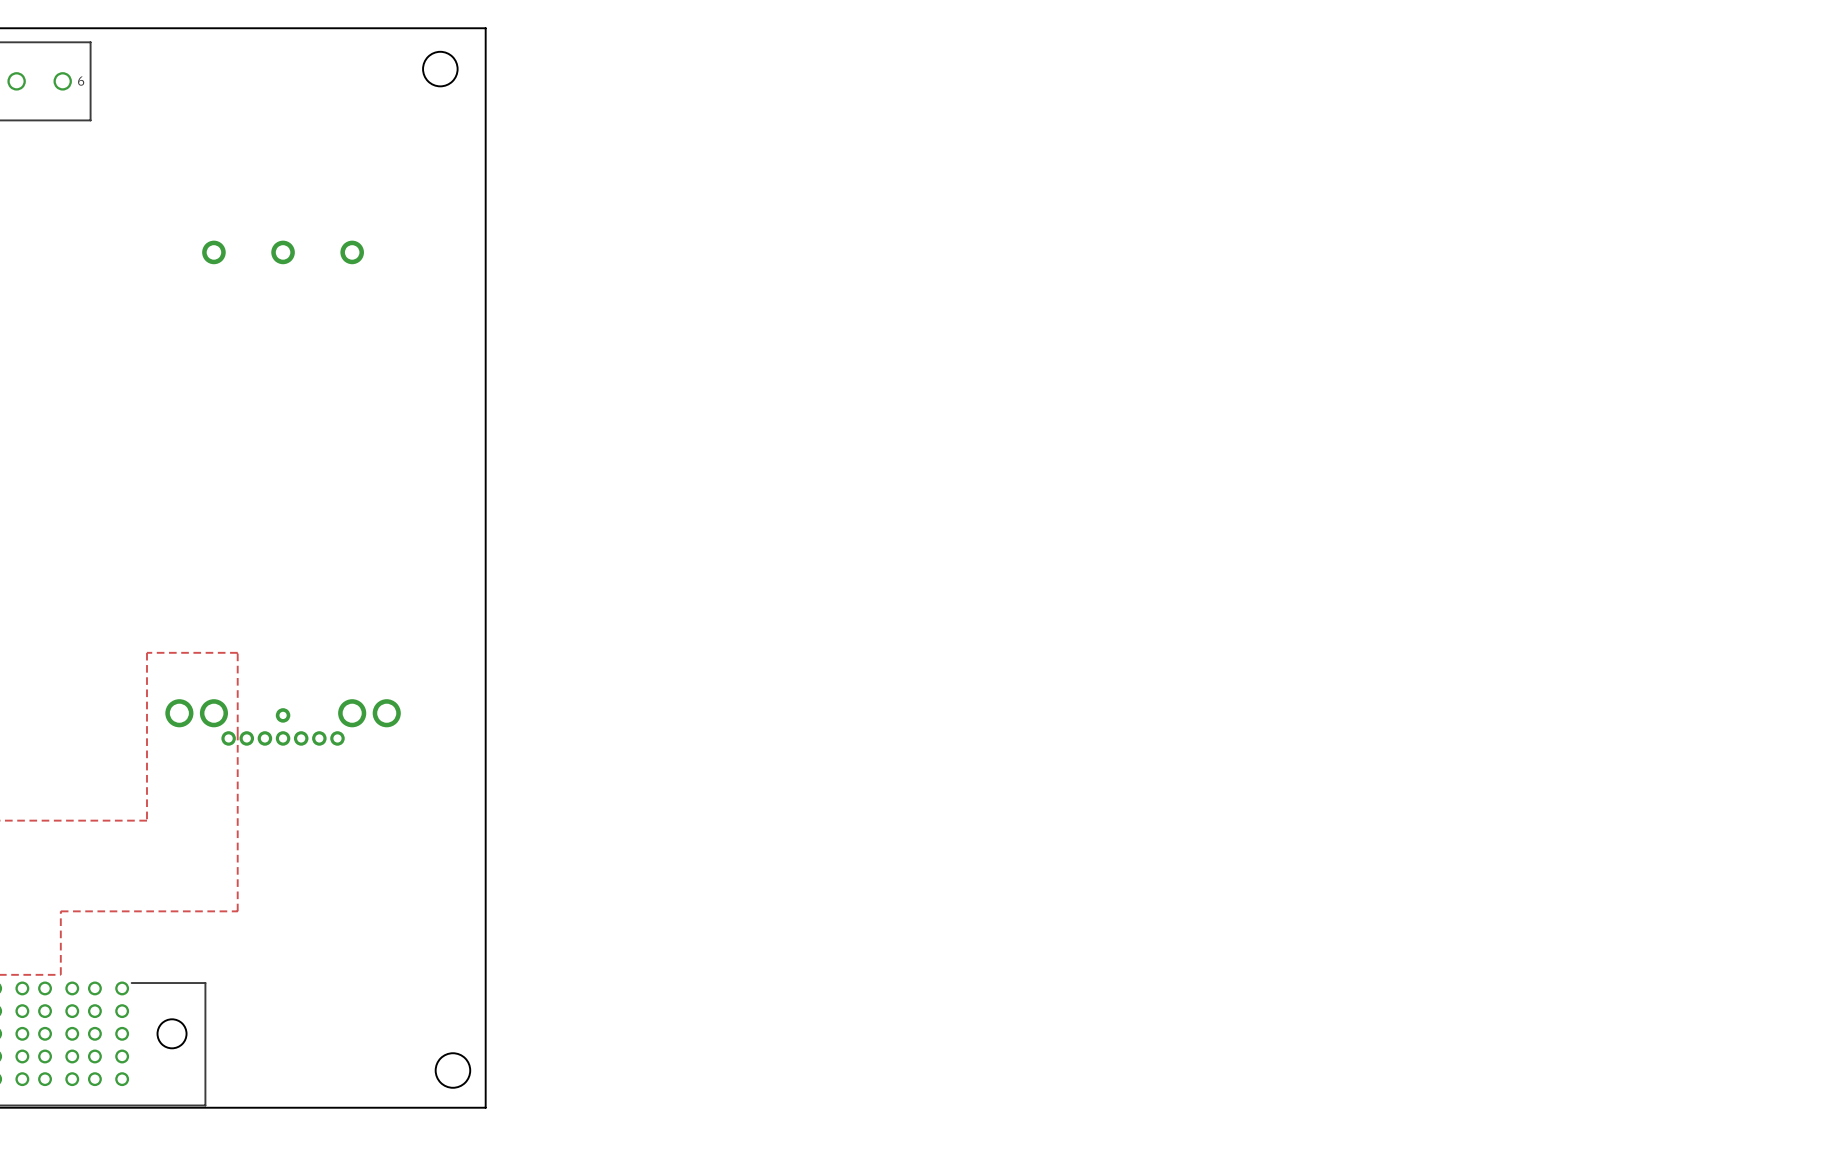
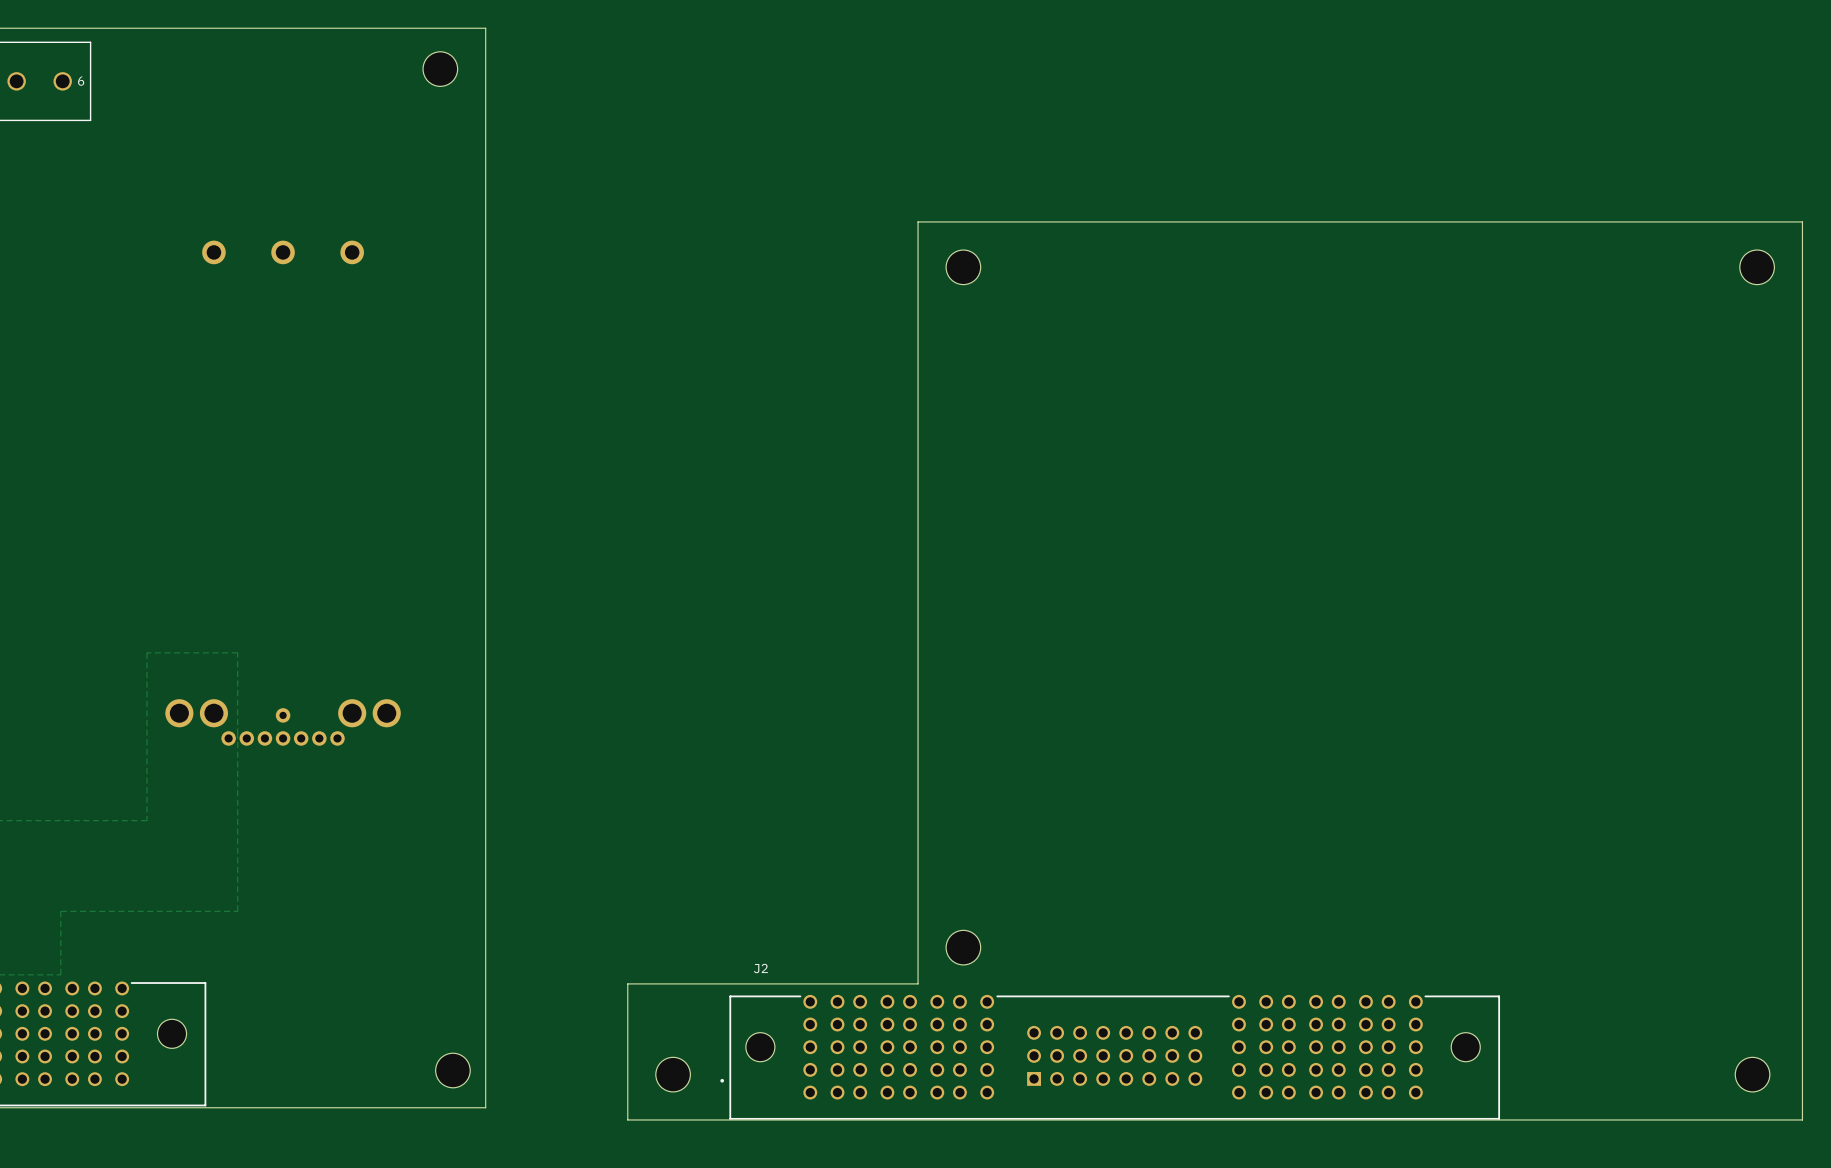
board edge: none -> (918, 221) (918, 983) (627, 983) (627, 1119) (1802, 1119) (1802, 221) (918, 221)
part: none -> (963, 267)
part: none -> (1757, 267)
part: none -> (963, 947)
J2: none -> (1110, 1057)
part: none -> (673, 1074)
part: none -> (1752, 1074)

